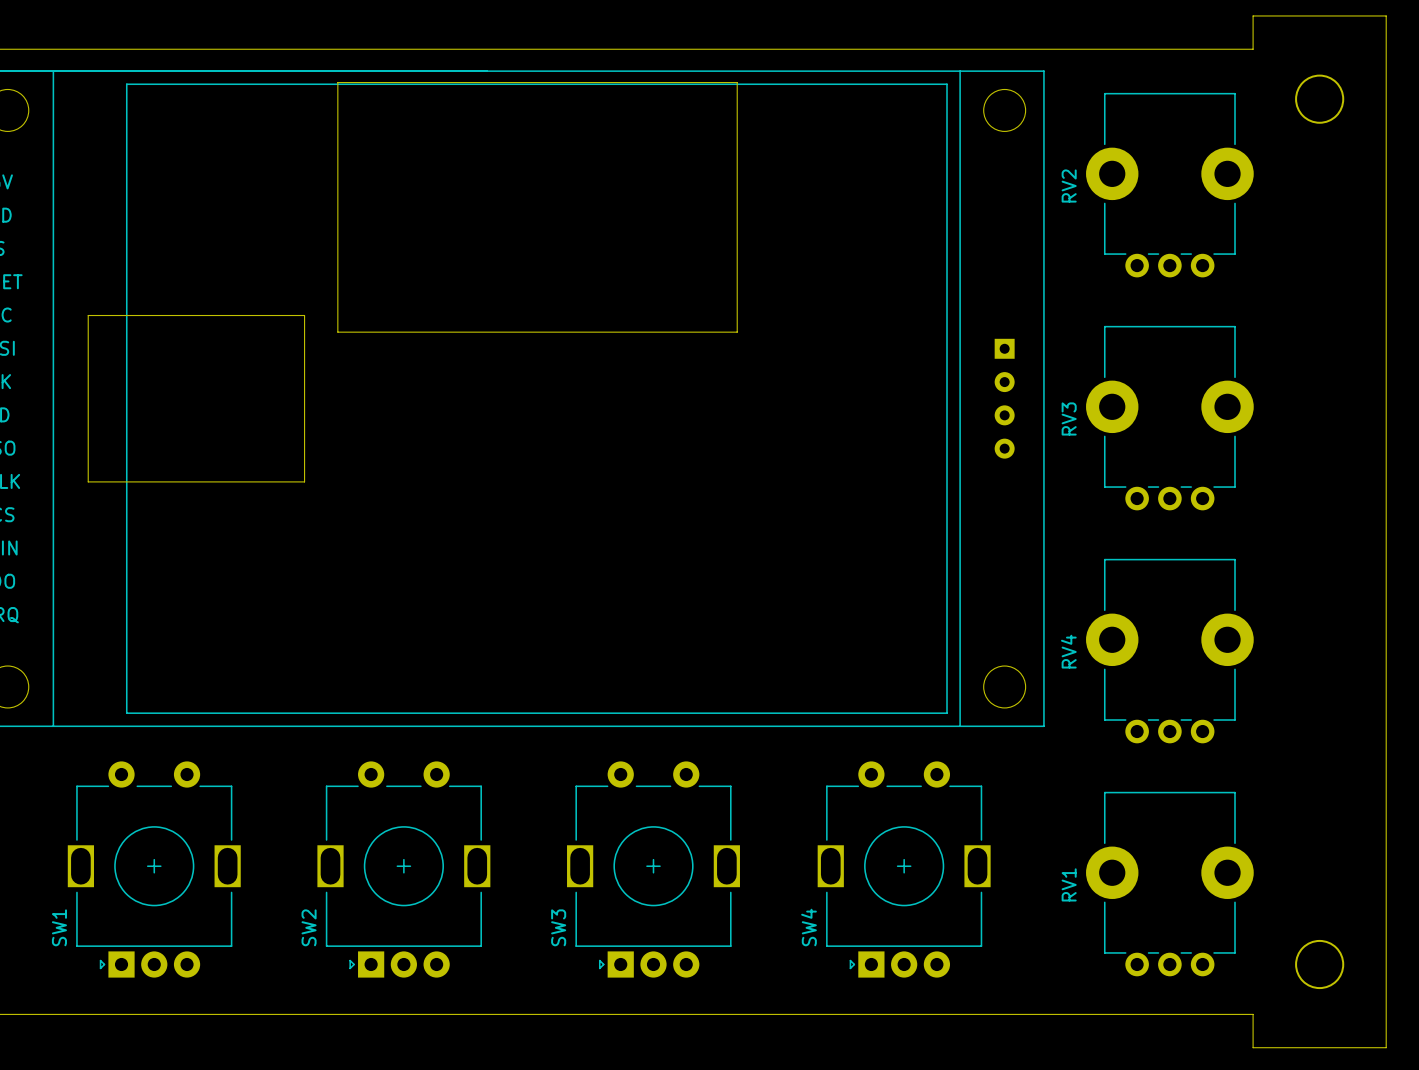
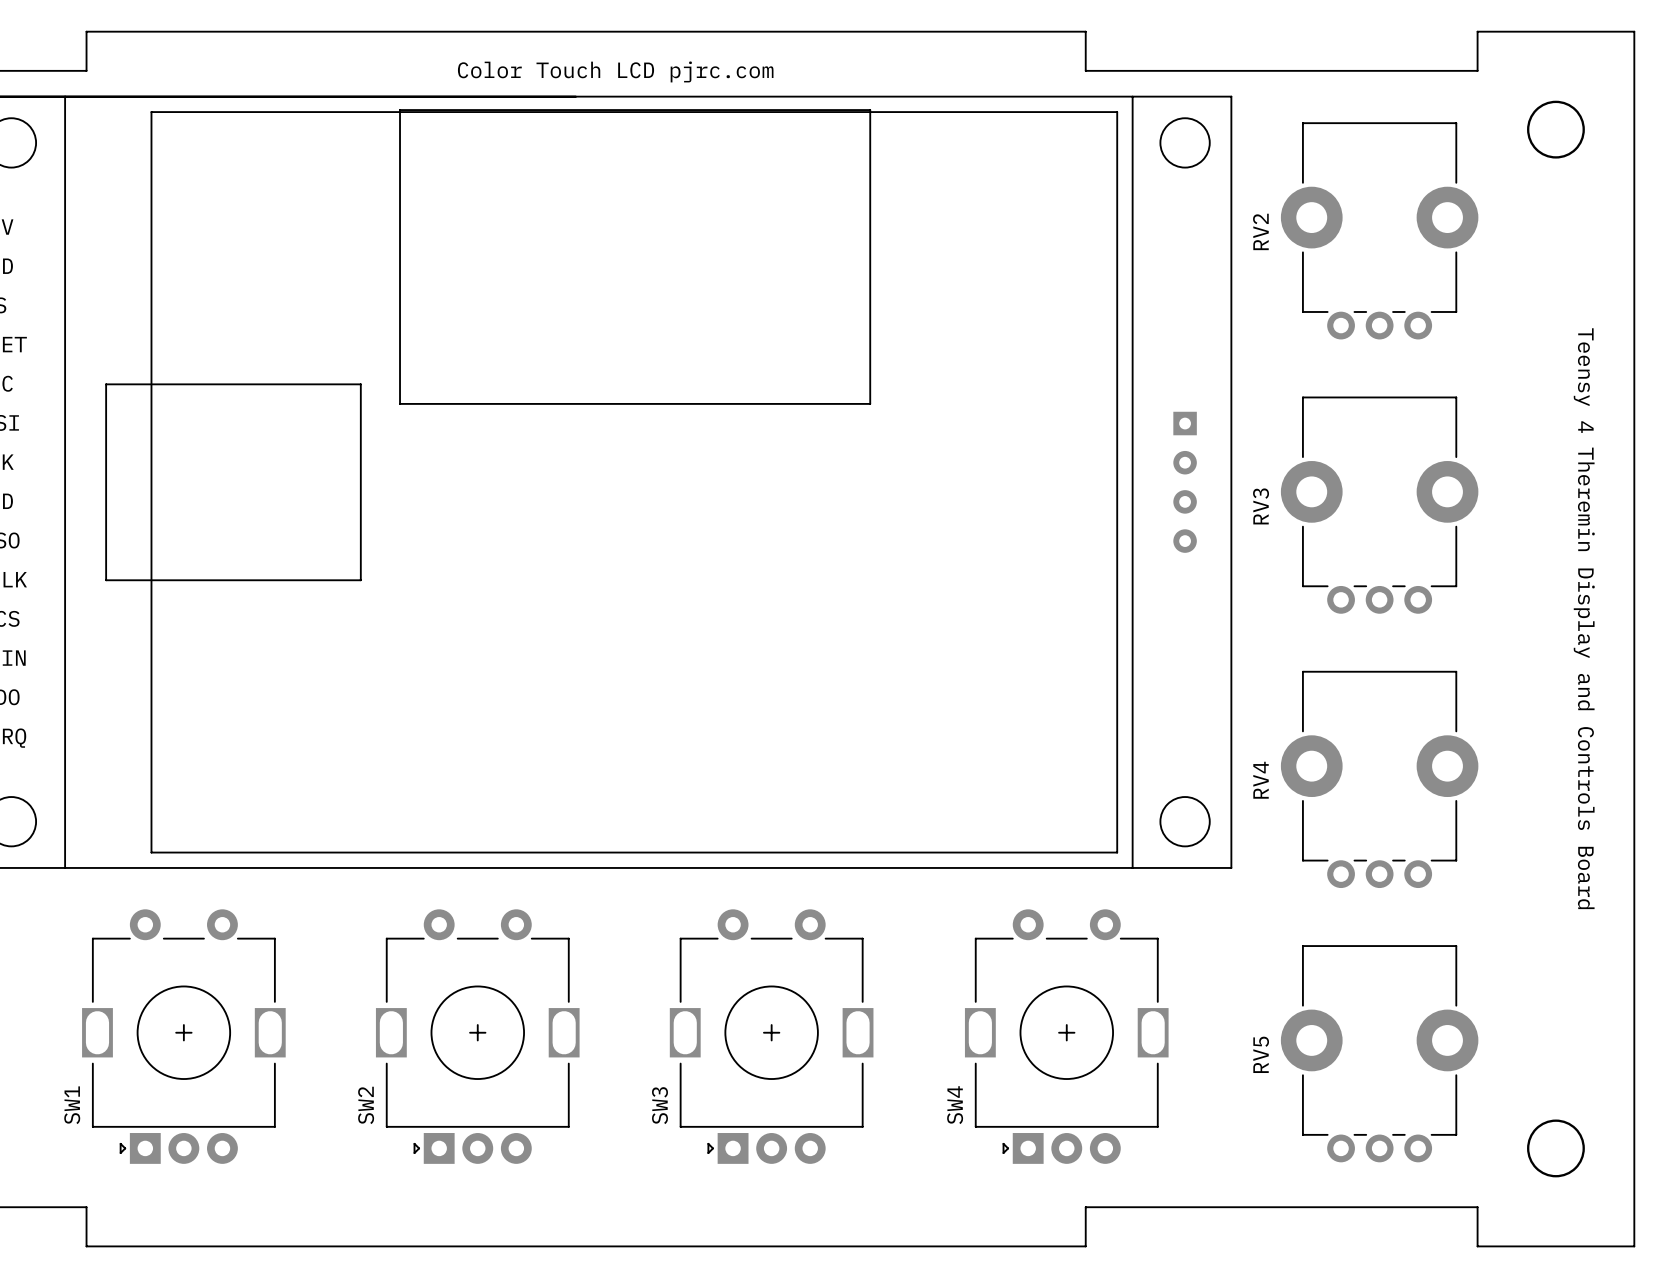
board edge: (71, 49) (920, 49) -> (86, 70) (86, 31) (1085, 31) (1085, 70)
text: none -> Color Touch LCD pjrc.com (615, 71)
text: none -> Teensy 4 Theremin Display and Controls Board (1584, 618)
RV1 name: RV1 (1069, 884) -> RV5 (1261, 1054)
board edge: (71, 1014) (920, 1014) -> (86, 1207) (86, 1246) (1085, 1246) (1085, 1207)

